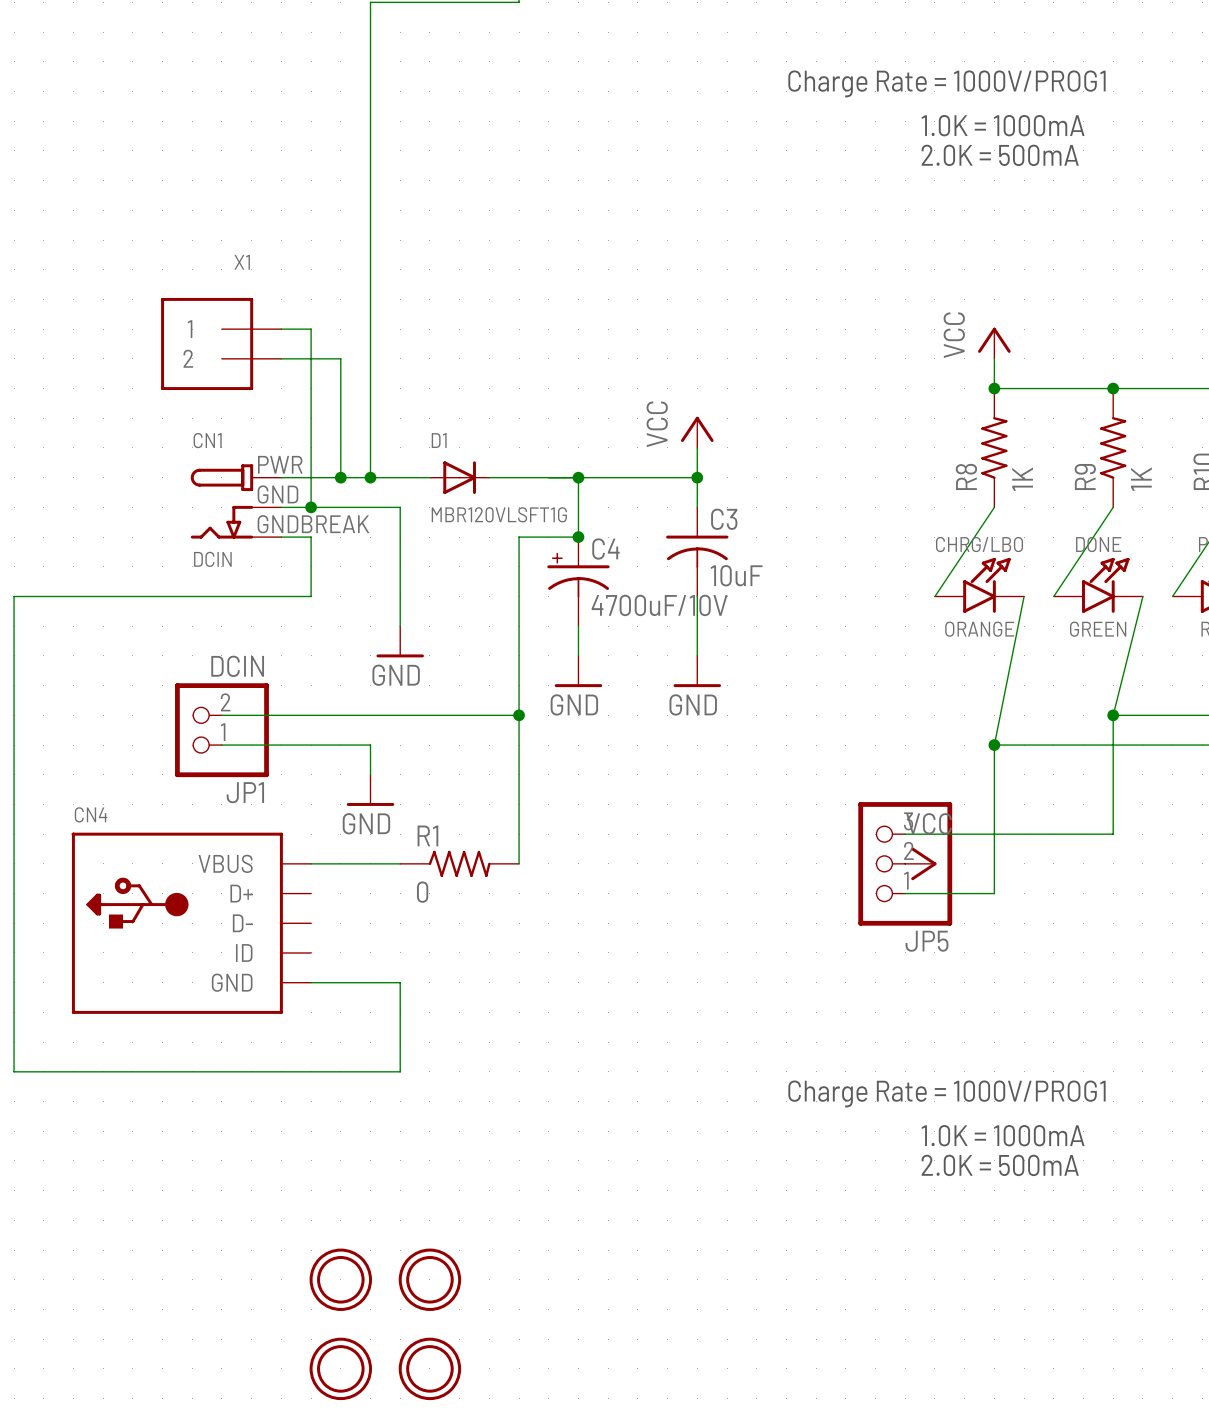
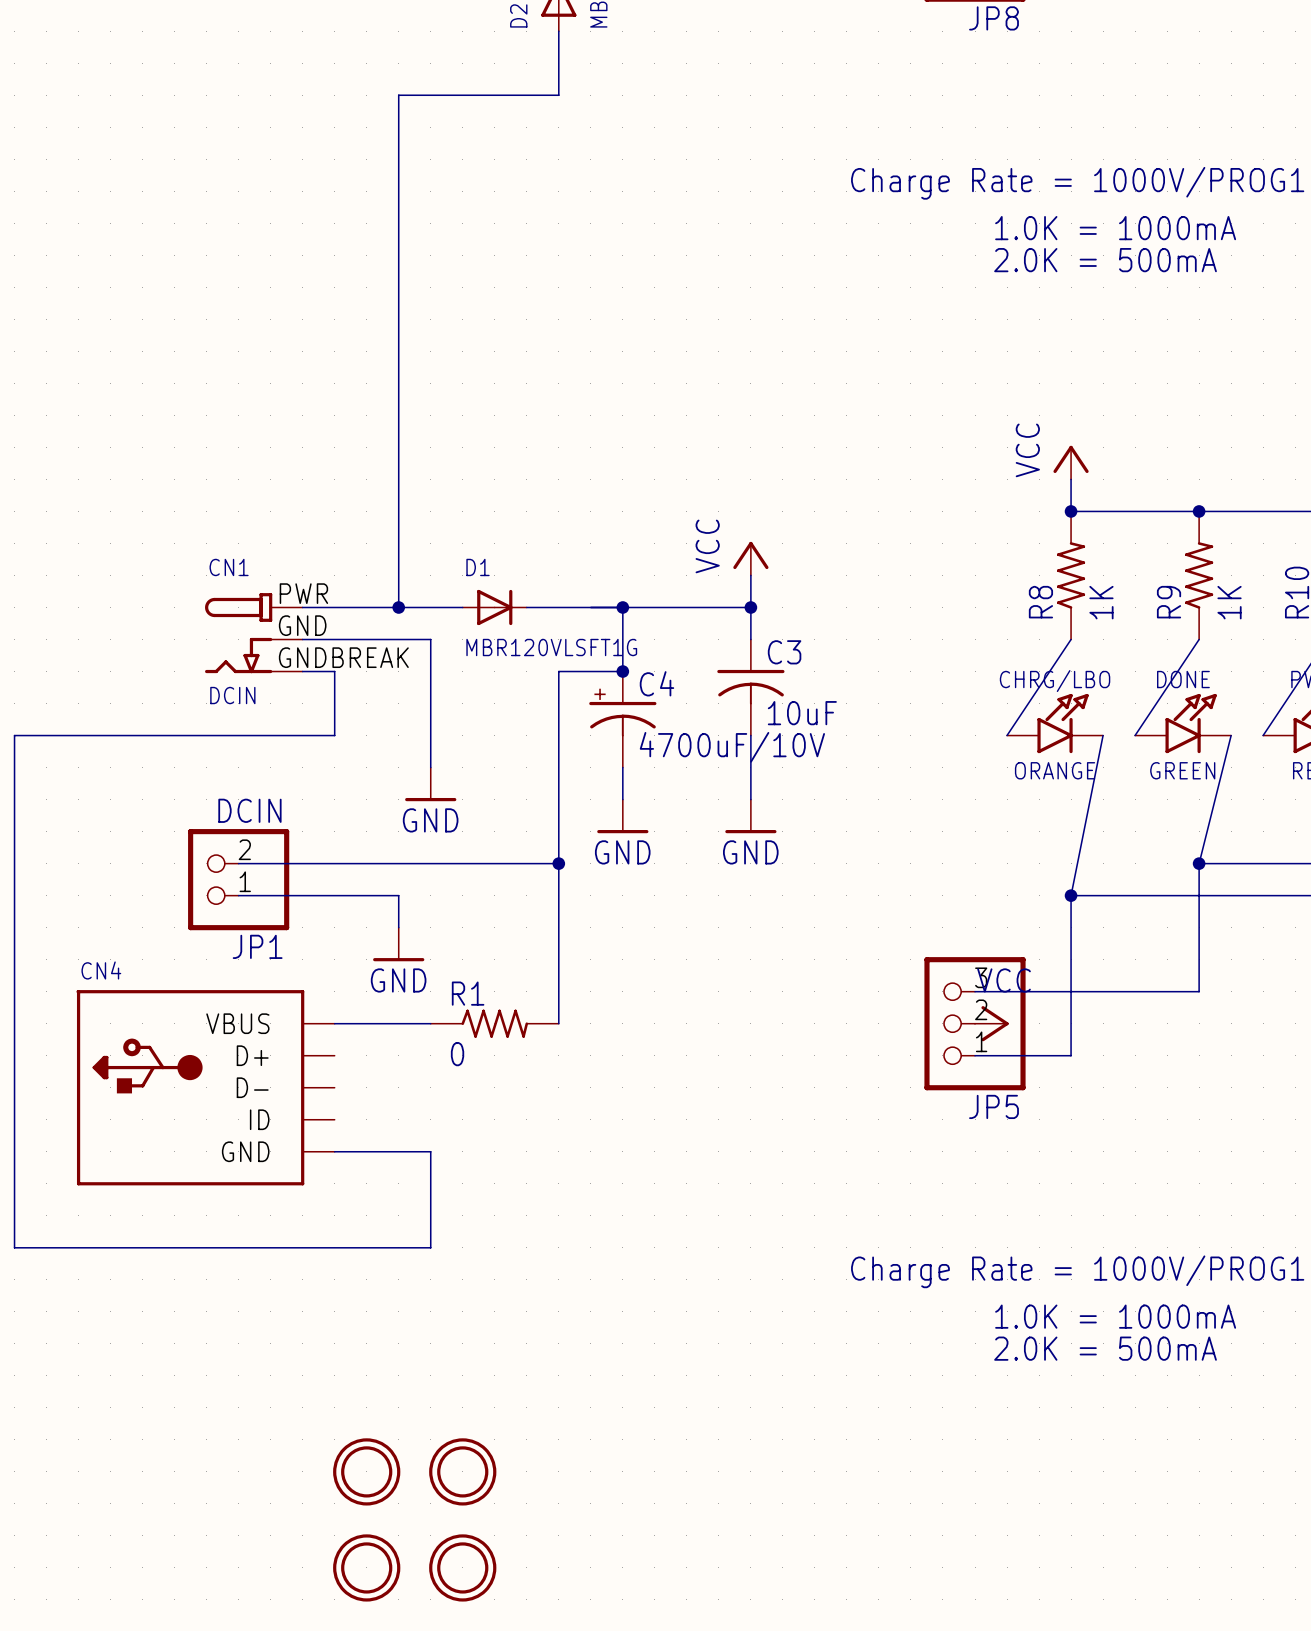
wire: (281, 329) (311, 329) (311, 507) -> none
X1: (221, 343) -> none
wire: (281, 358) (340, 358) (340, 477) -> none
junction: (340, 477) -> none
junction: (311, 507) -> none

